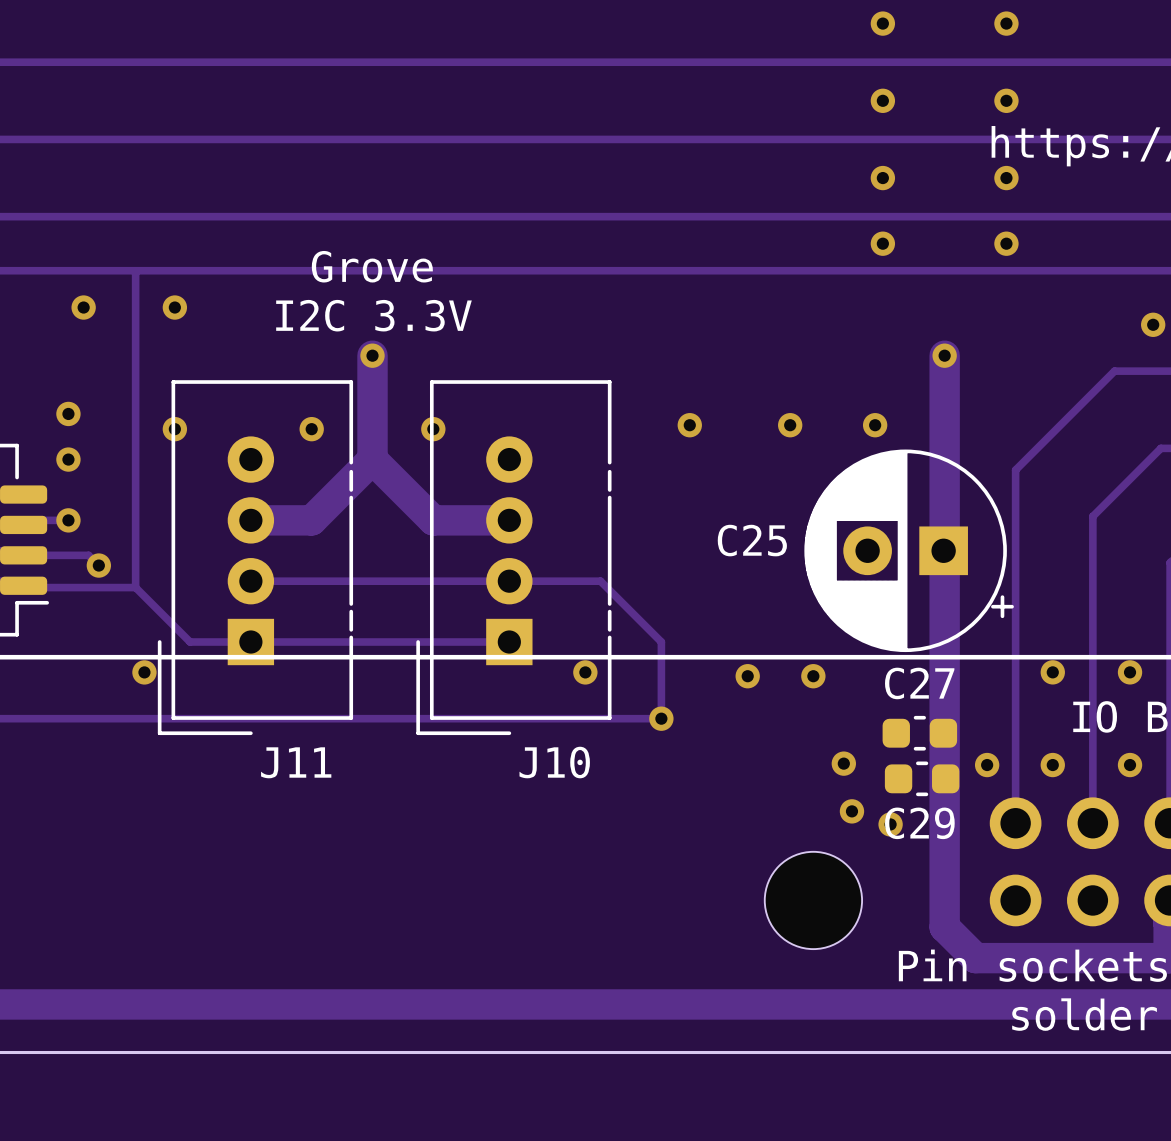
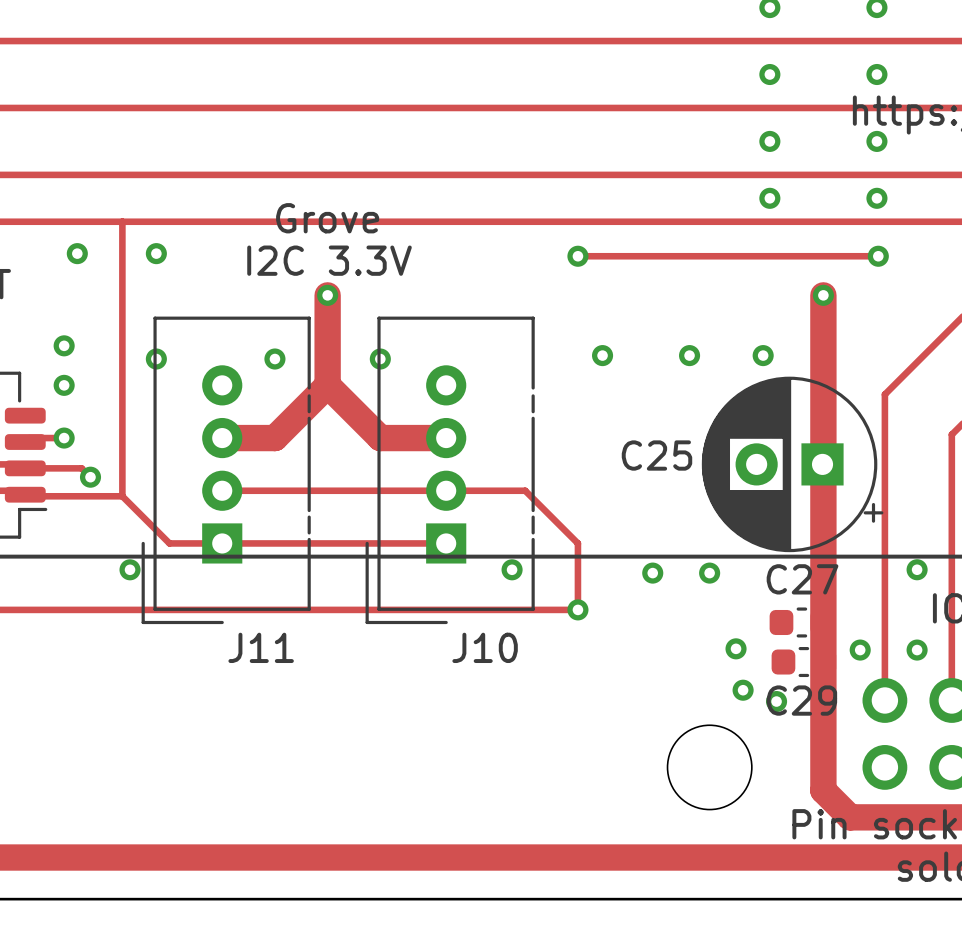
track: none -> (577, 256) (878, 256)
via: none -> (577, 256)
via: none -> (878, 256)

